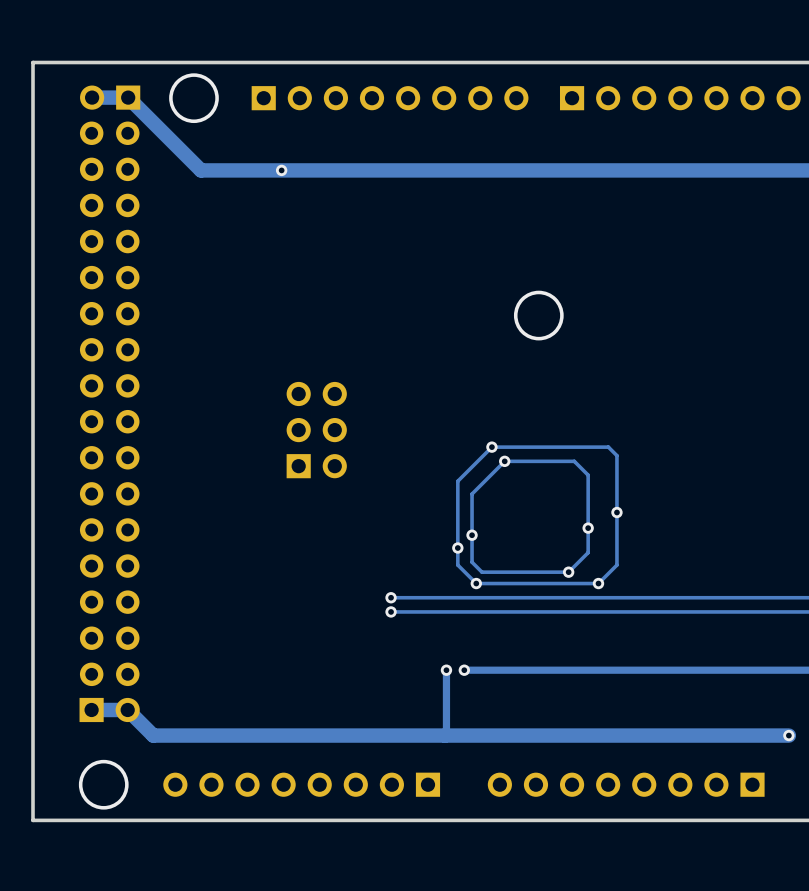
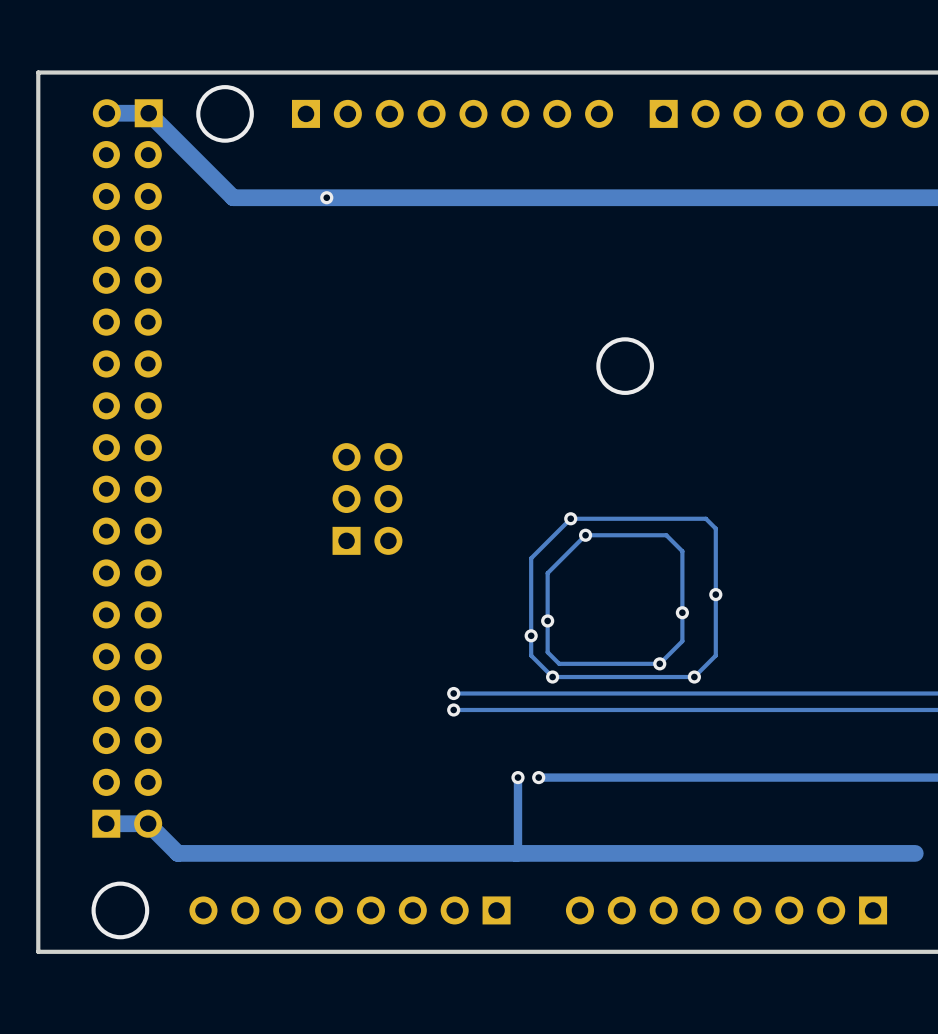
via: (788, 735) -> none

